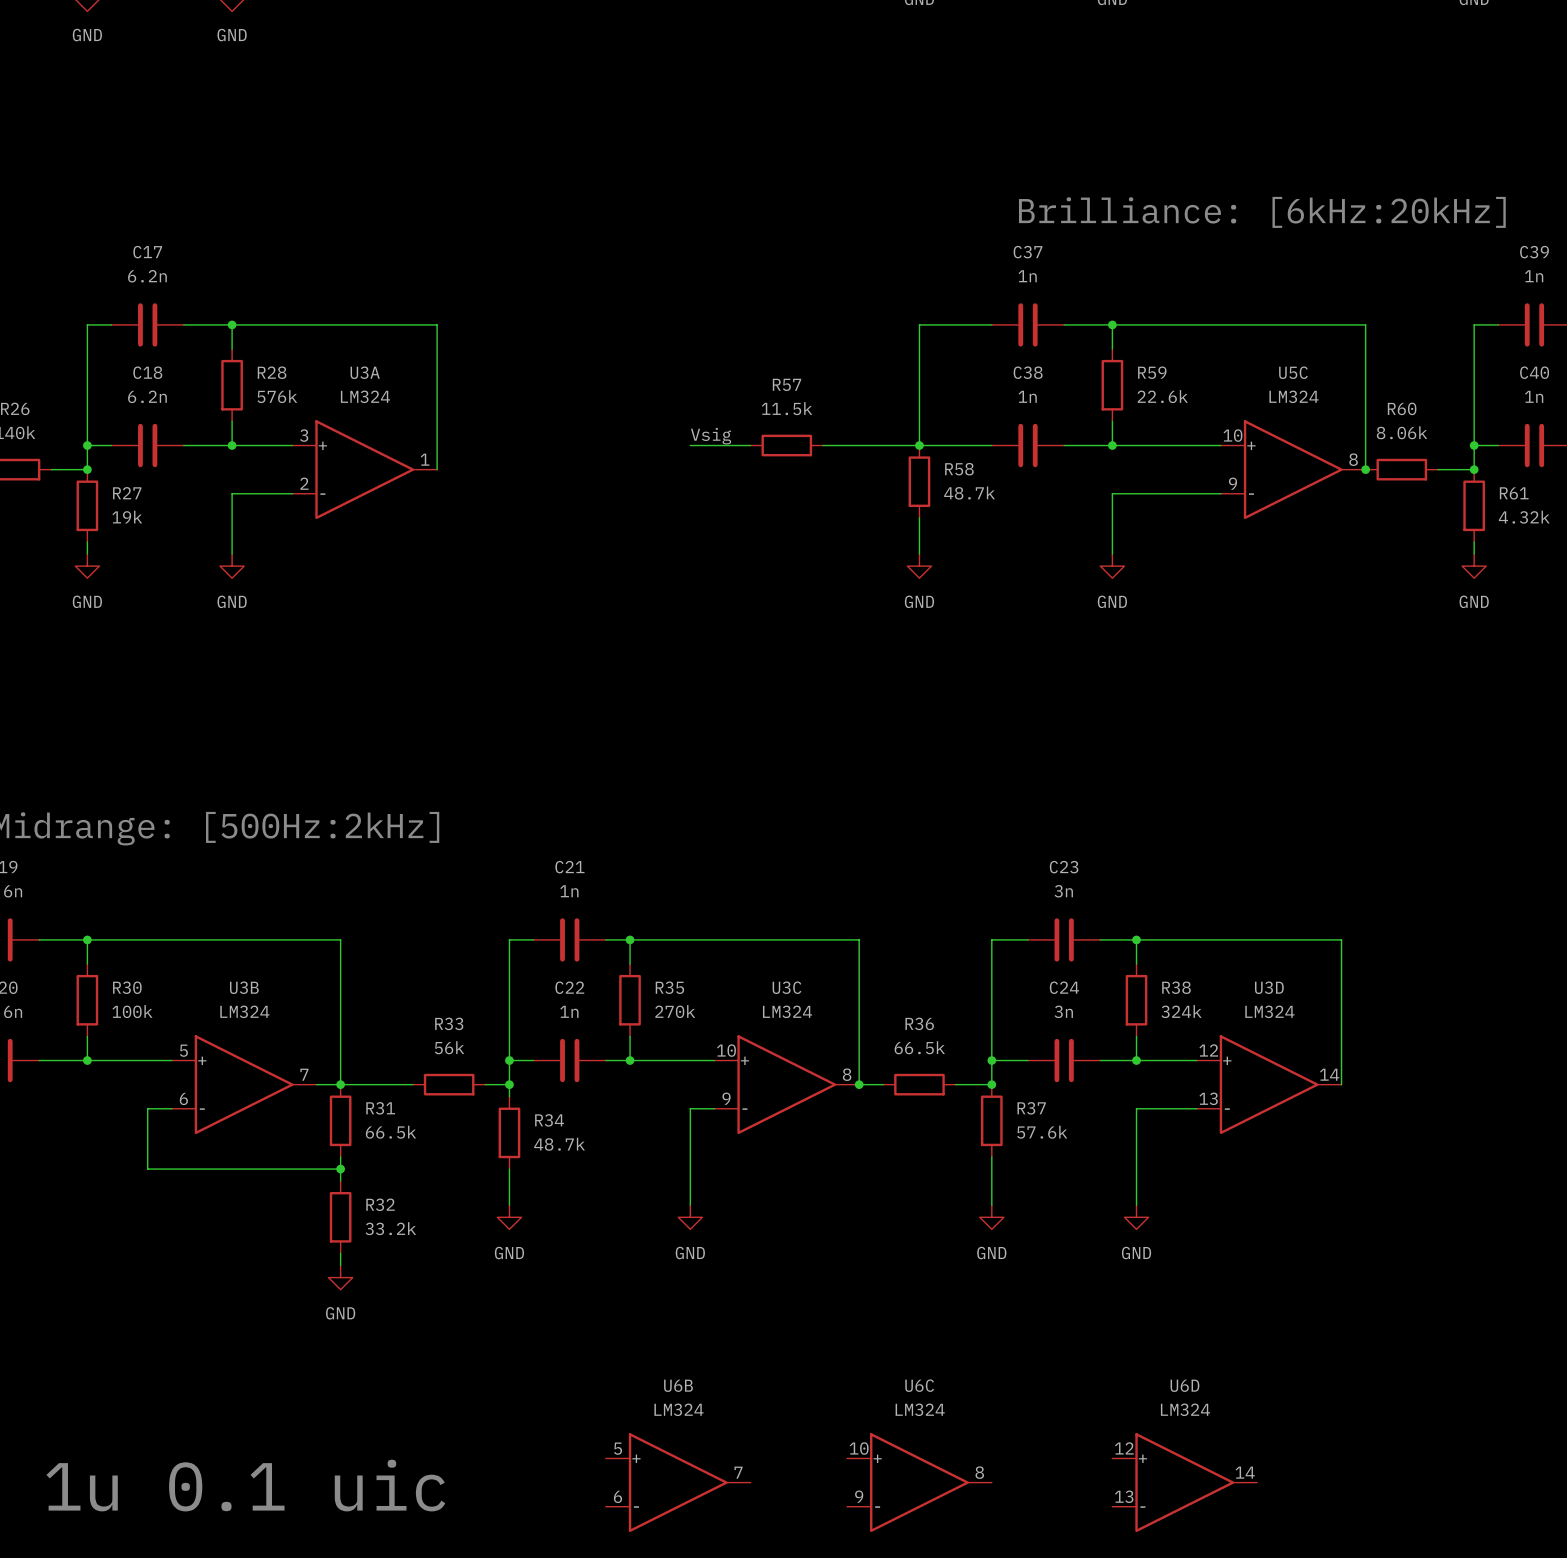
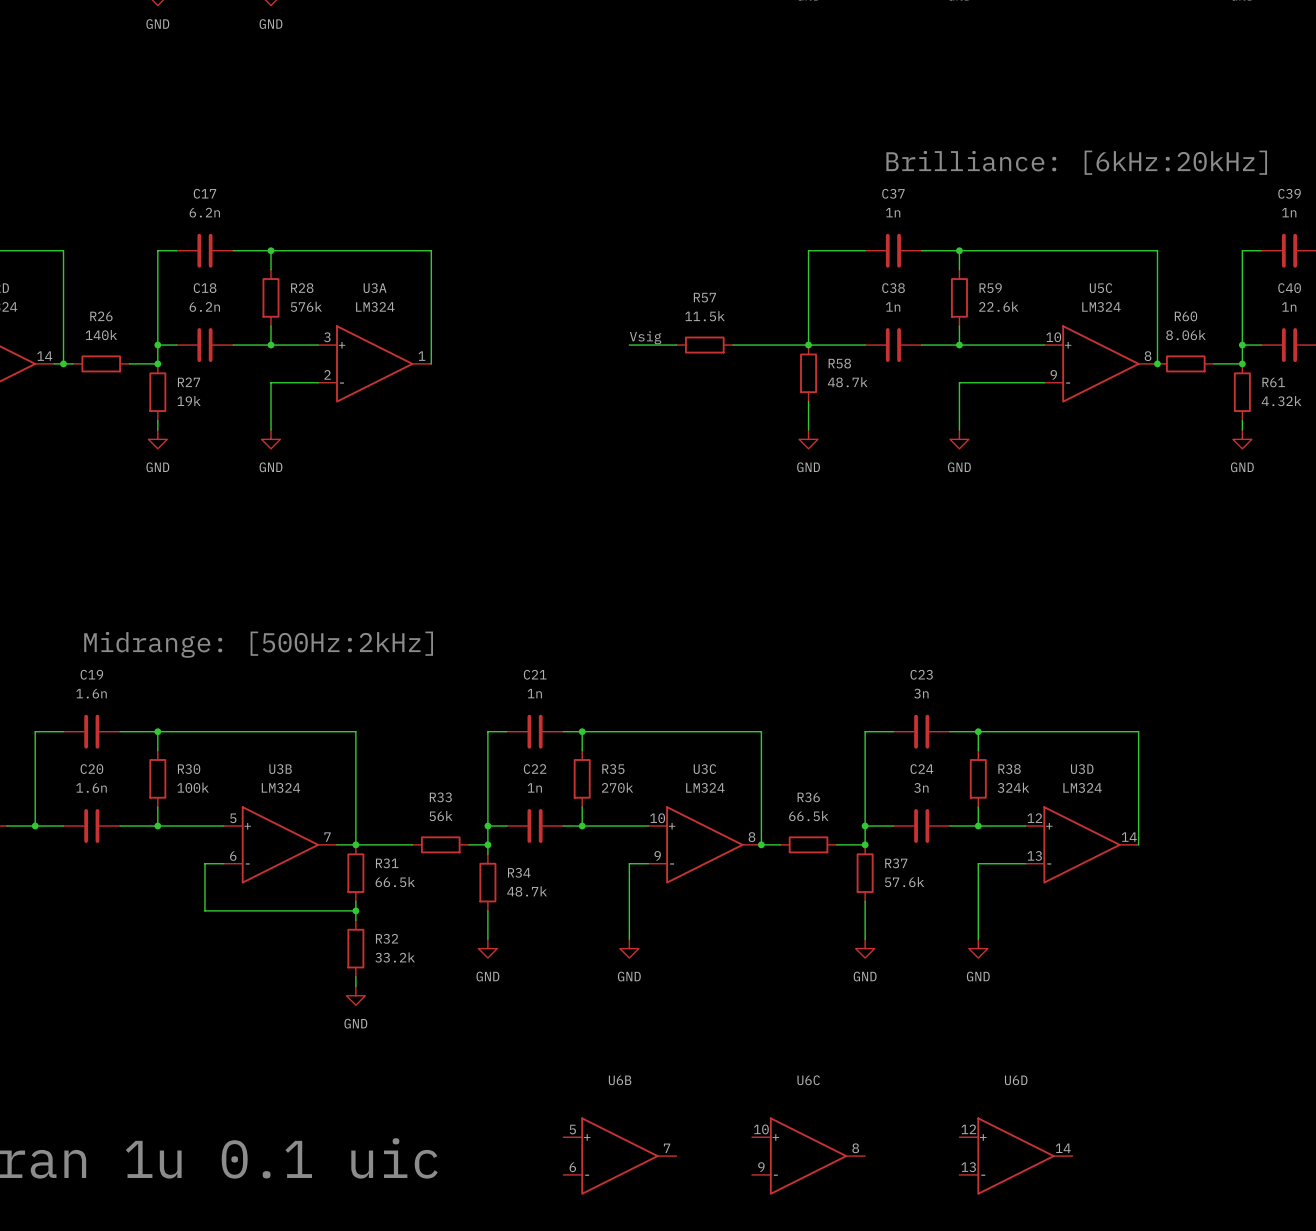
U6B value: LM324 (678, 1409) -> none
U6C value: LM324 (920, 1409) -> none
U6D value: LM324 (1185, 1409) -> none

